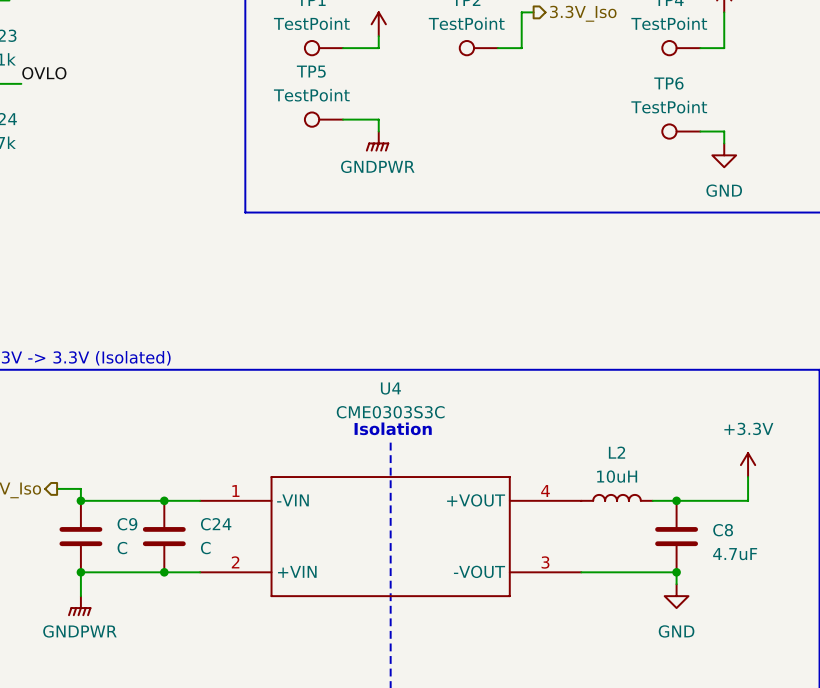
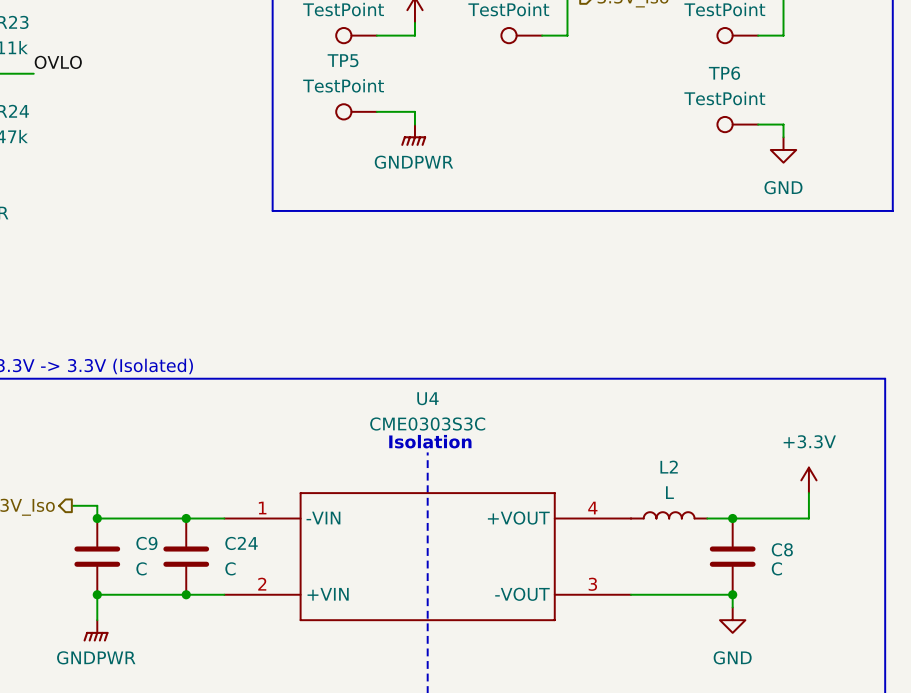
L2 value: 10uH (617, 476) -> L (669, 492)
C8 value: 4.7uF (735, 554) -> C (776, 568)

